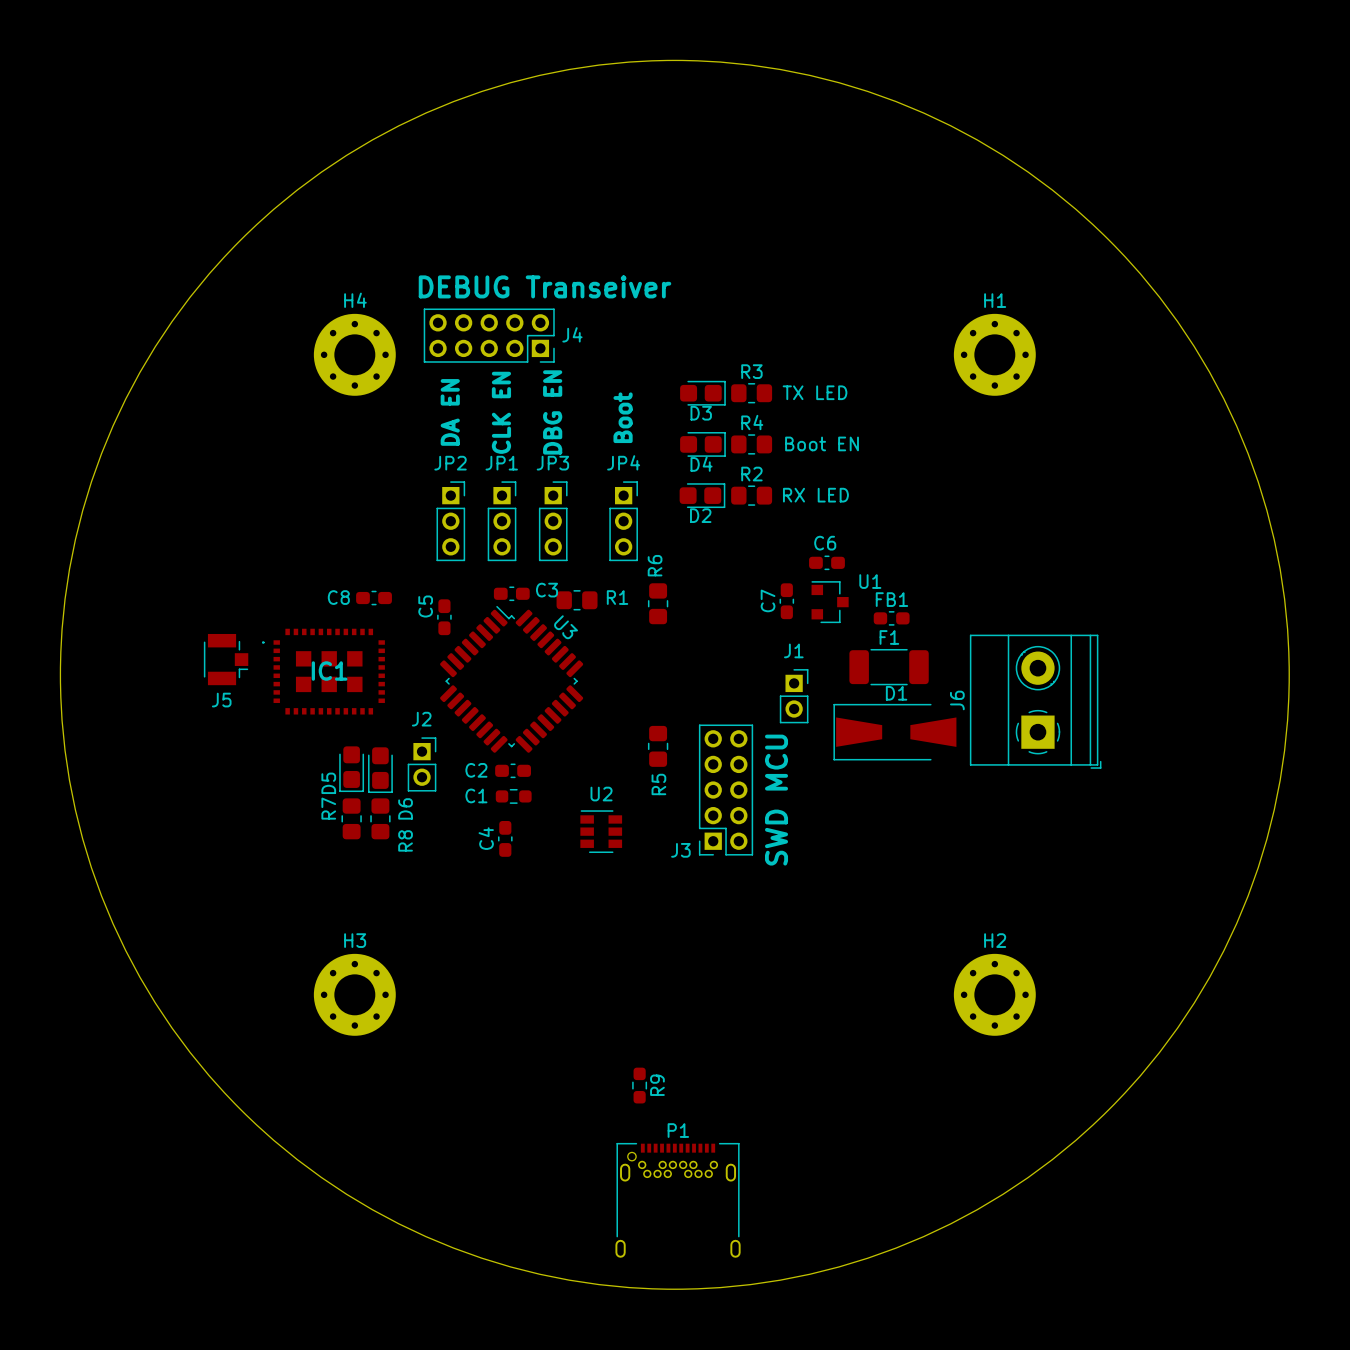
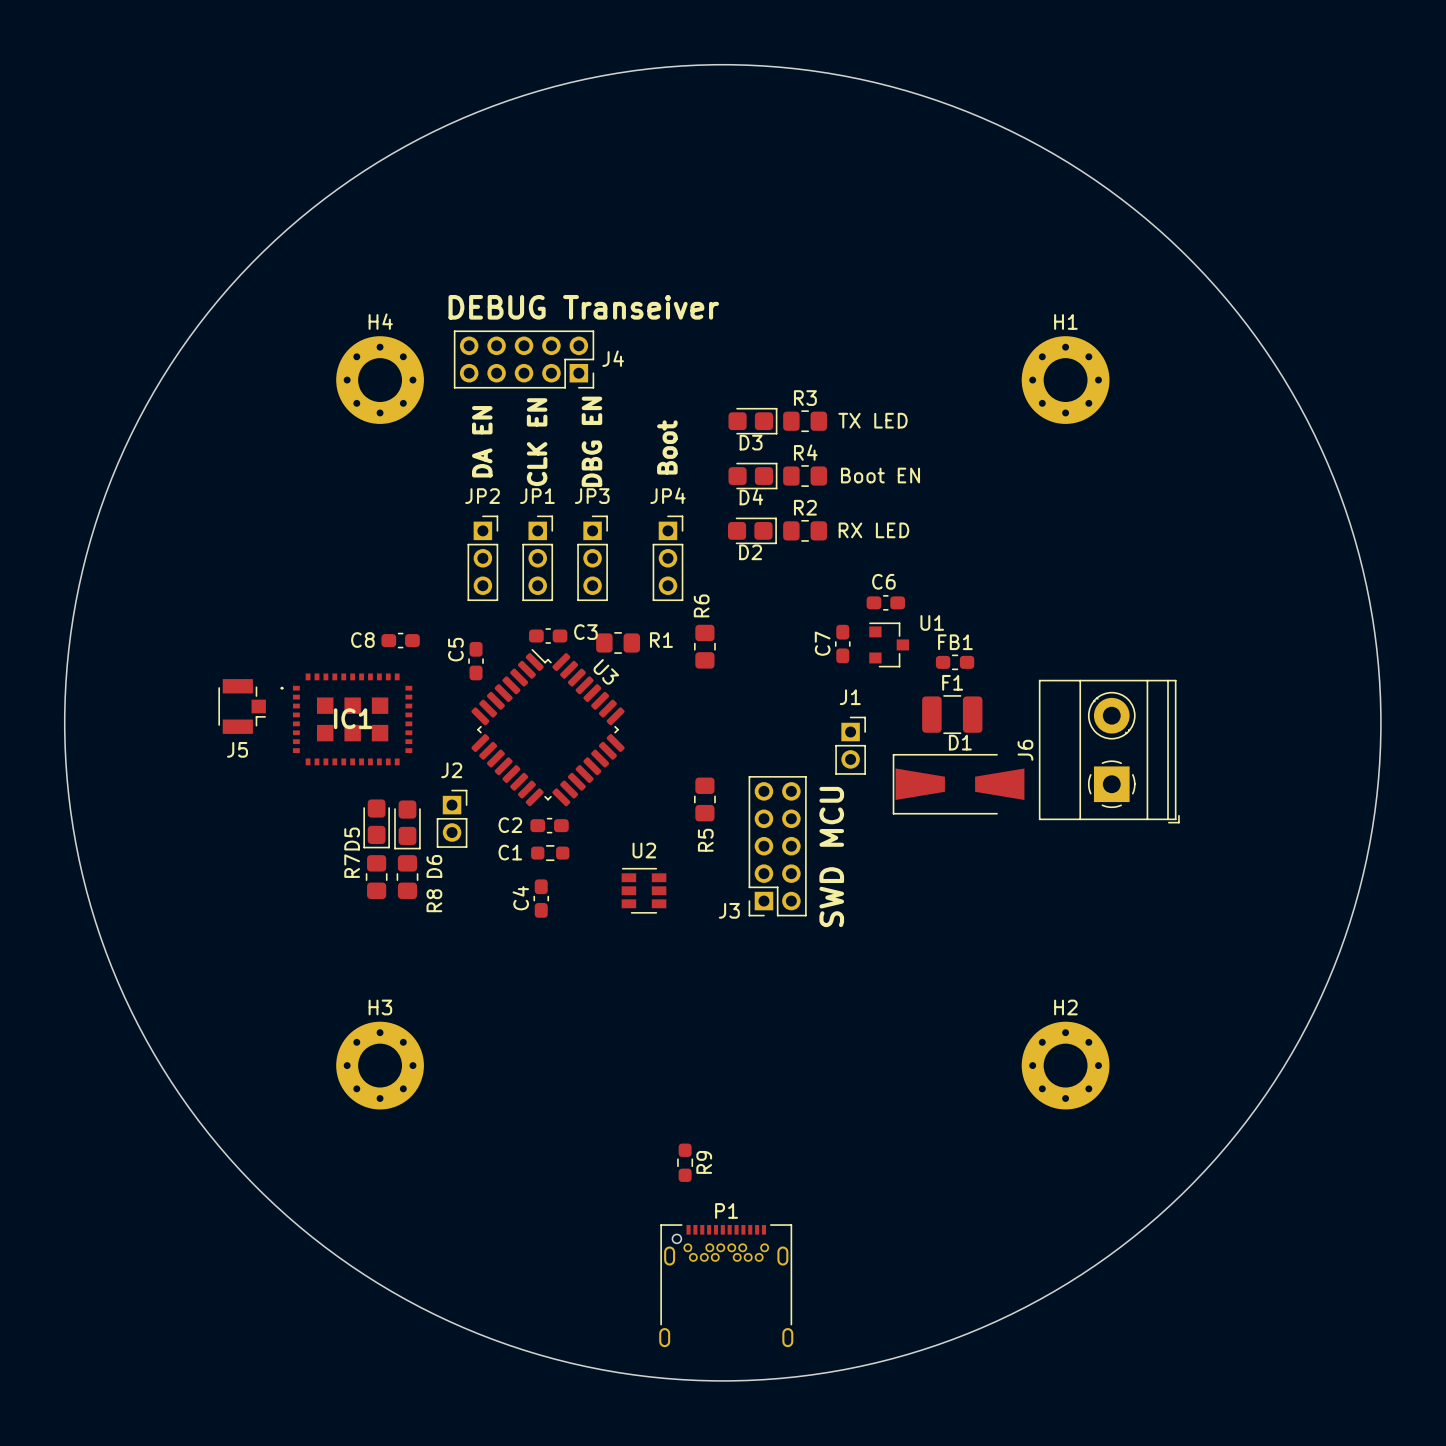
F1 footprint: [849, 648, 929, 686] -> [922, 695, 983, 735]

